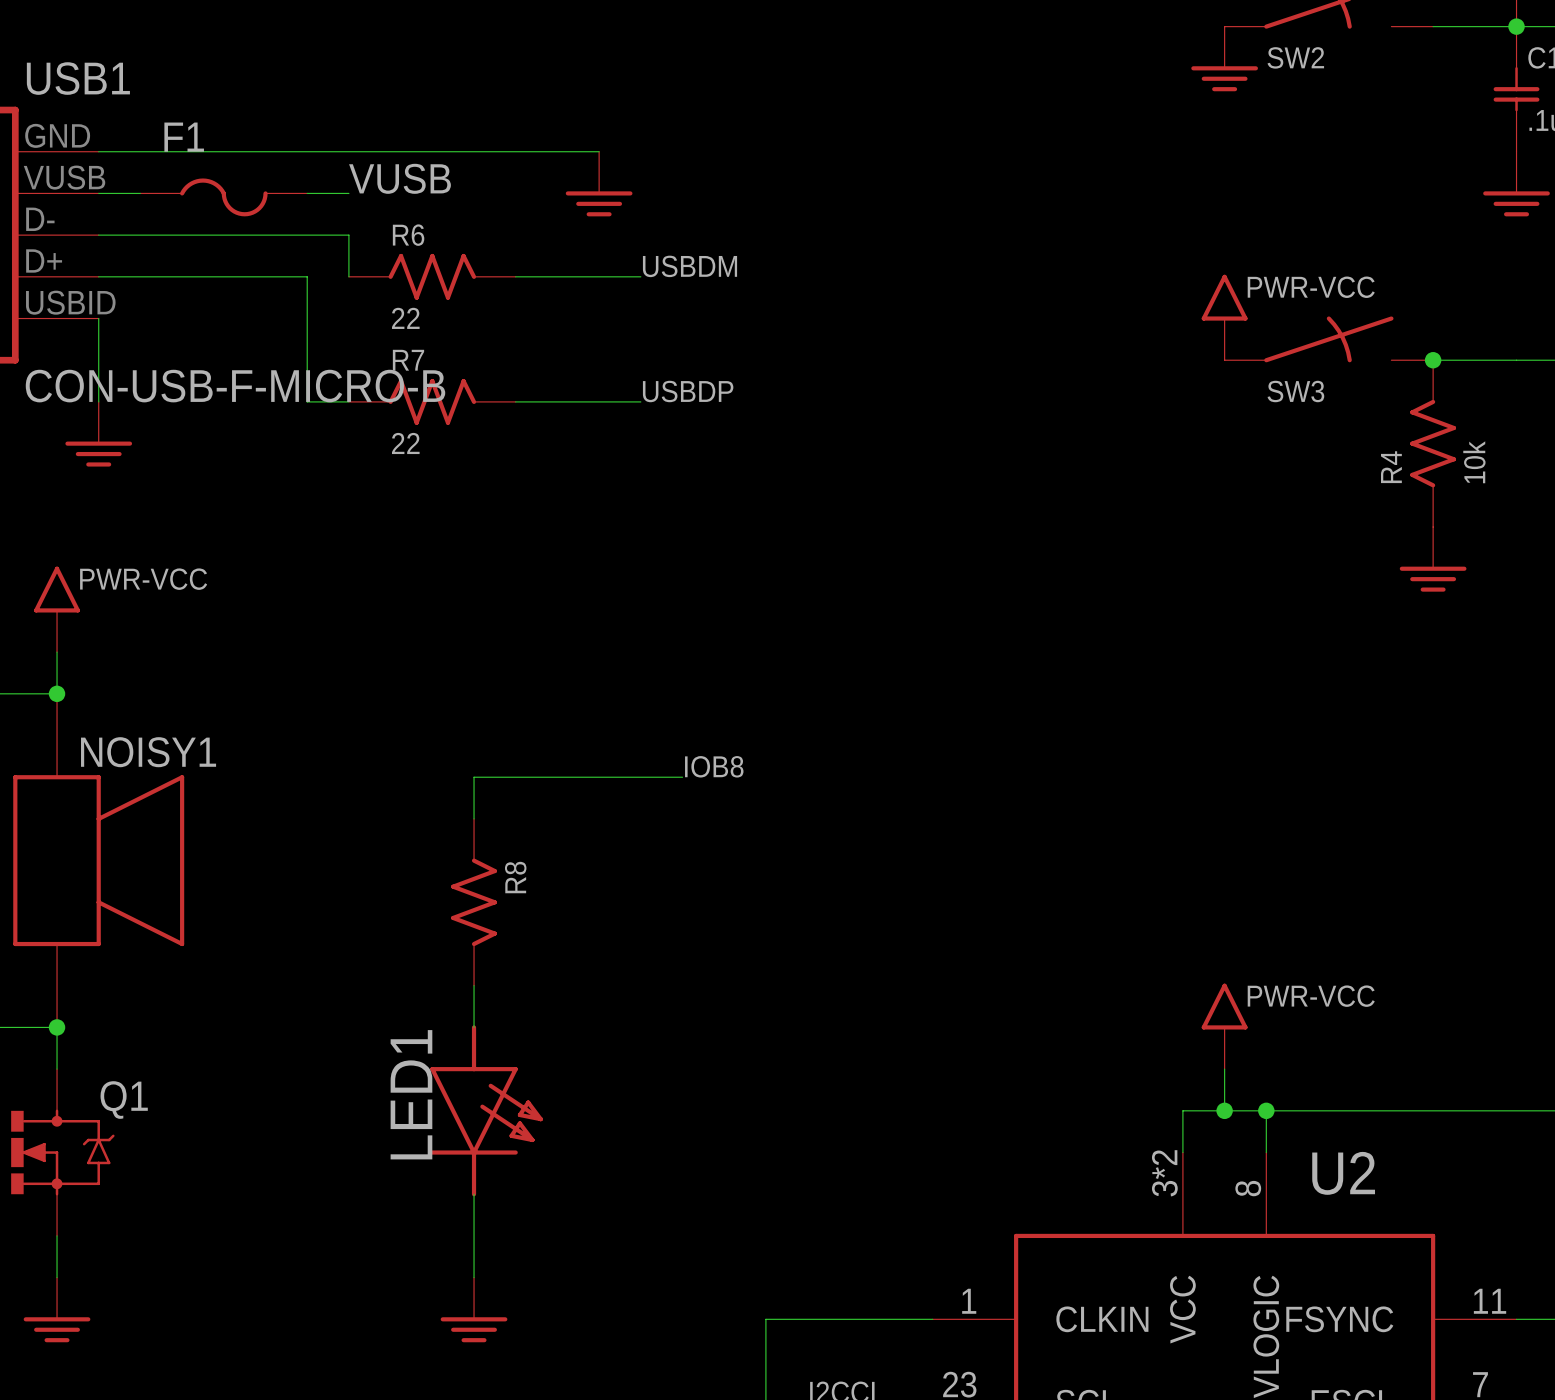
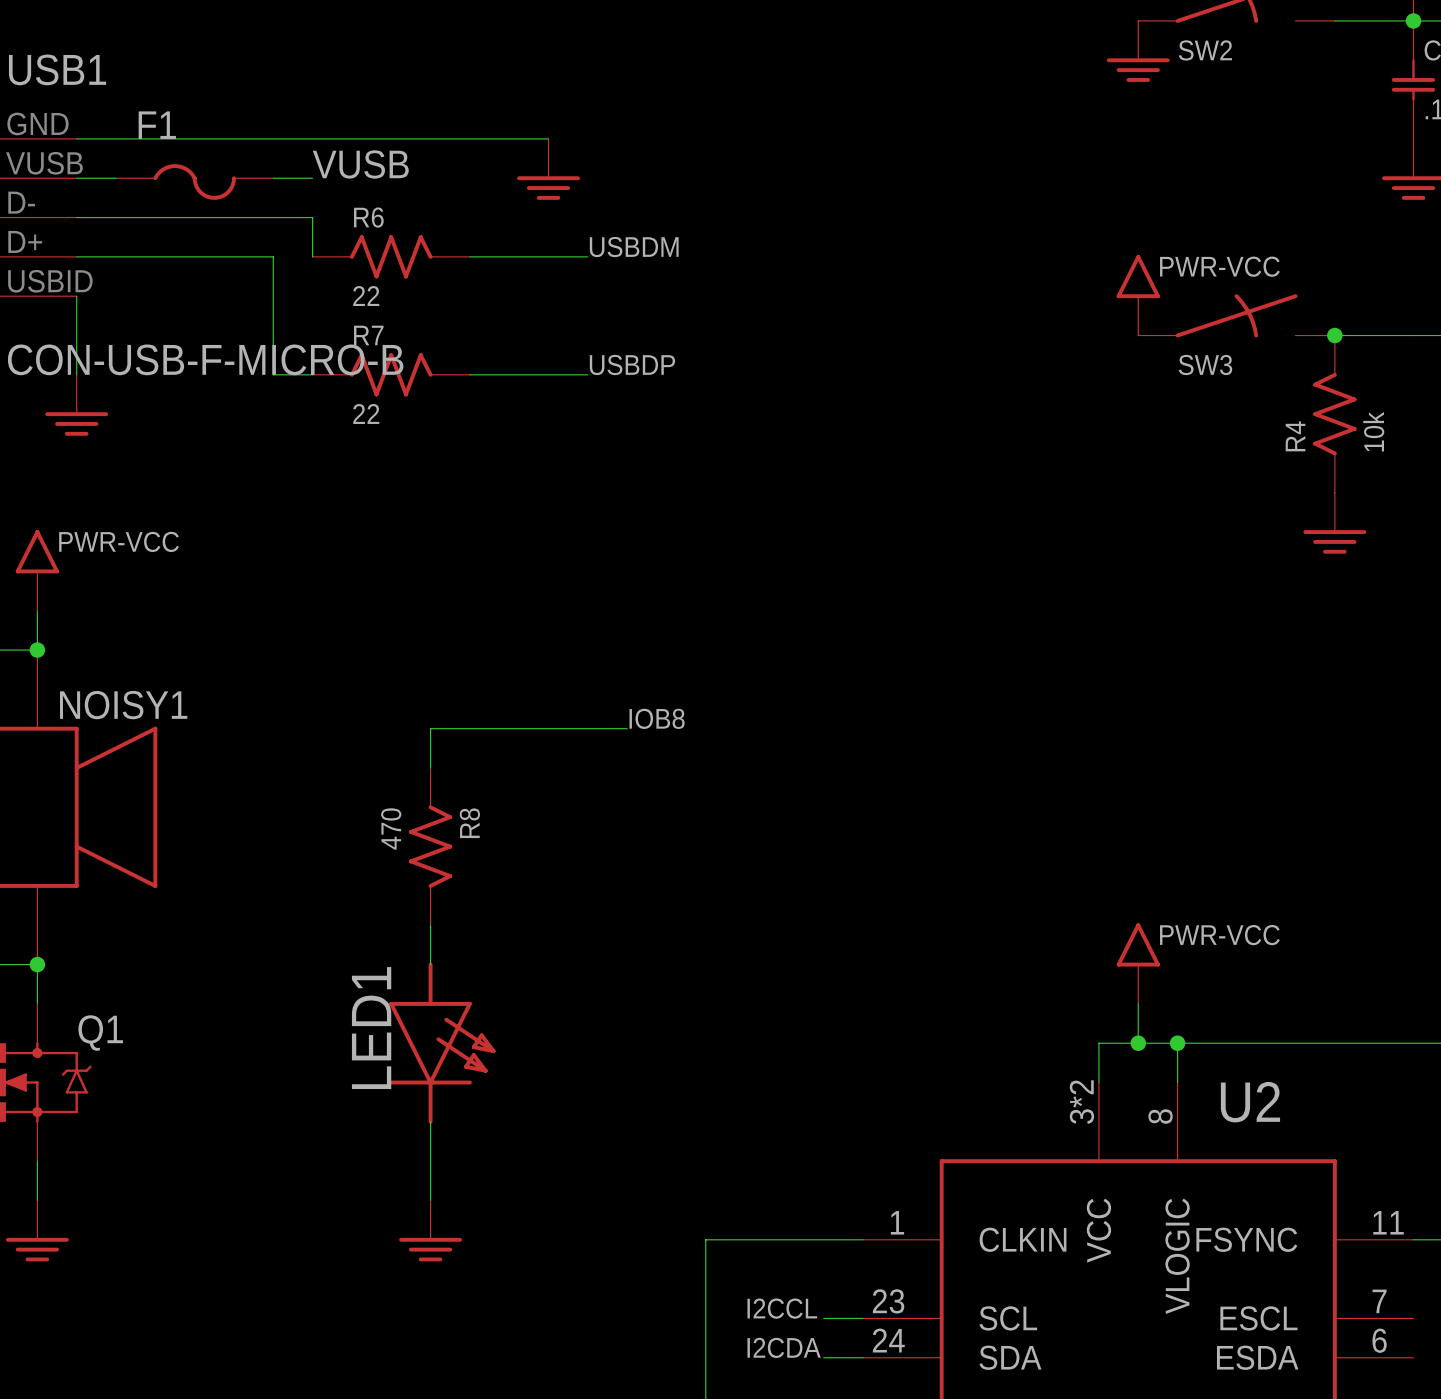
R8 value: none -> 470 (391, 828)

